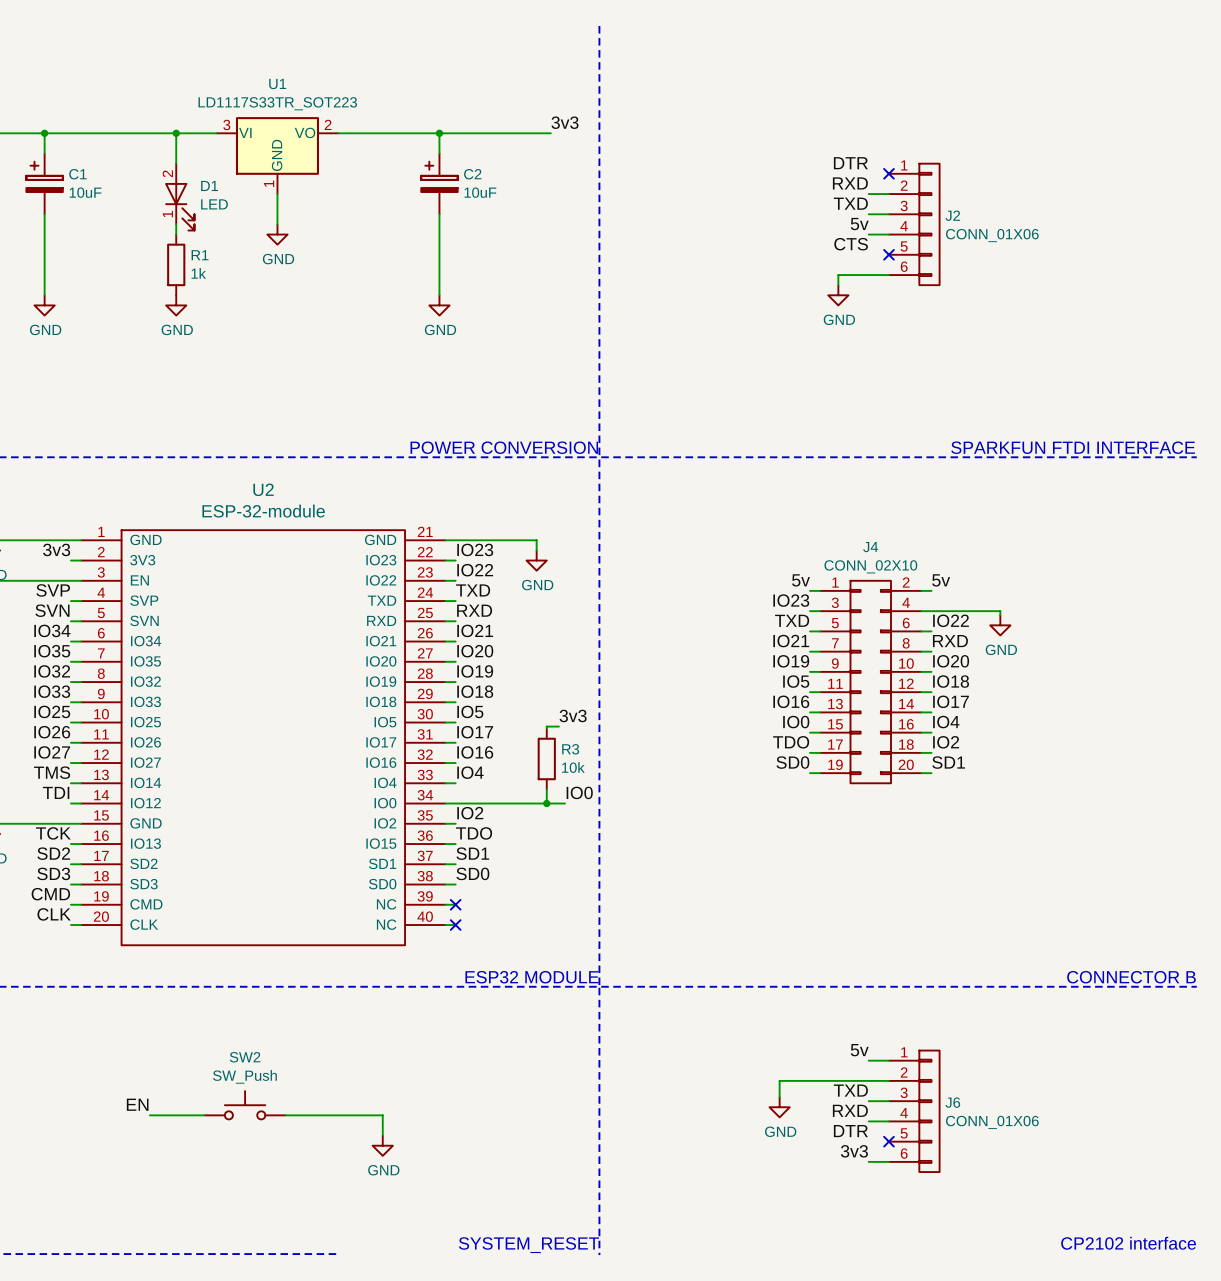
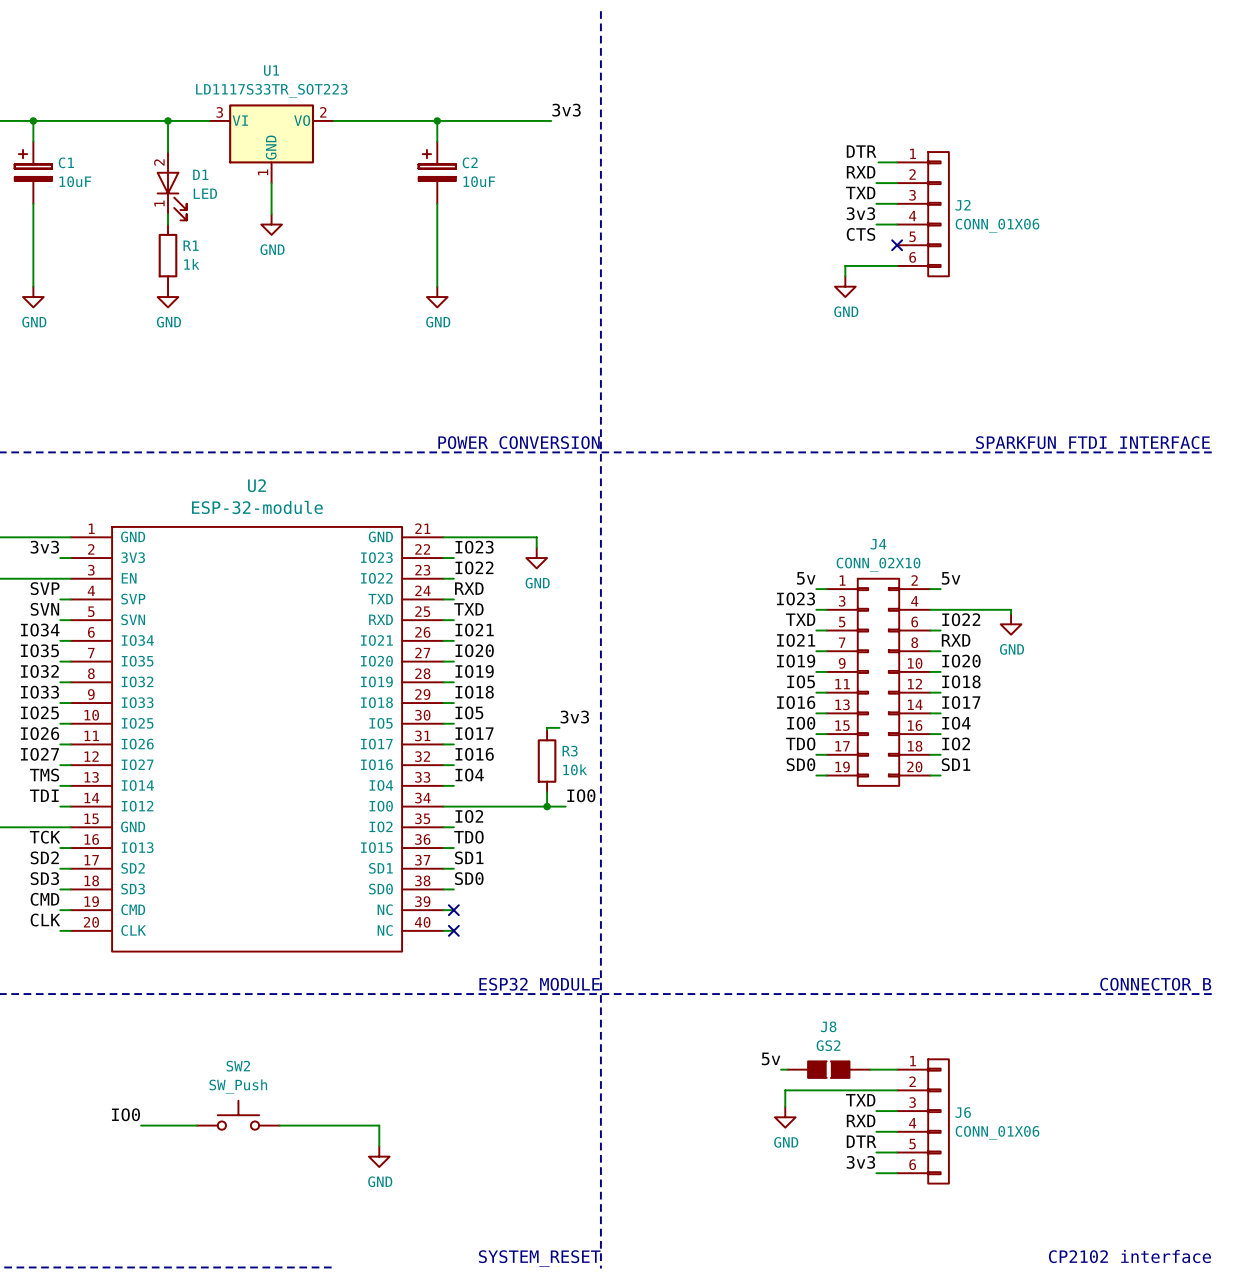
wire: none -> (878, 162) (897, 162)
no-connect mark: (888, 173) -> none
label: 5v (859, 224) -> 3v3 (860, 213)
label: TXD (473, 590) -> RXD (469, 588)
label: RXD (474, 610) -> TXD (468, 609)
label position: 5v (859, 1050) -> 5v (771, 1058)
wire: none -> (781, 1069) (787, 1069)
J8: none -> GS2 (828, 1069)
wire: none -> (870, 1069) (876, 1069)
label: EN (137, 1104) -> IO0 (125, 1114)
wire: none -> (876, 1152) (897, 1152)
no-connect mark: (888, 1141) -> none

